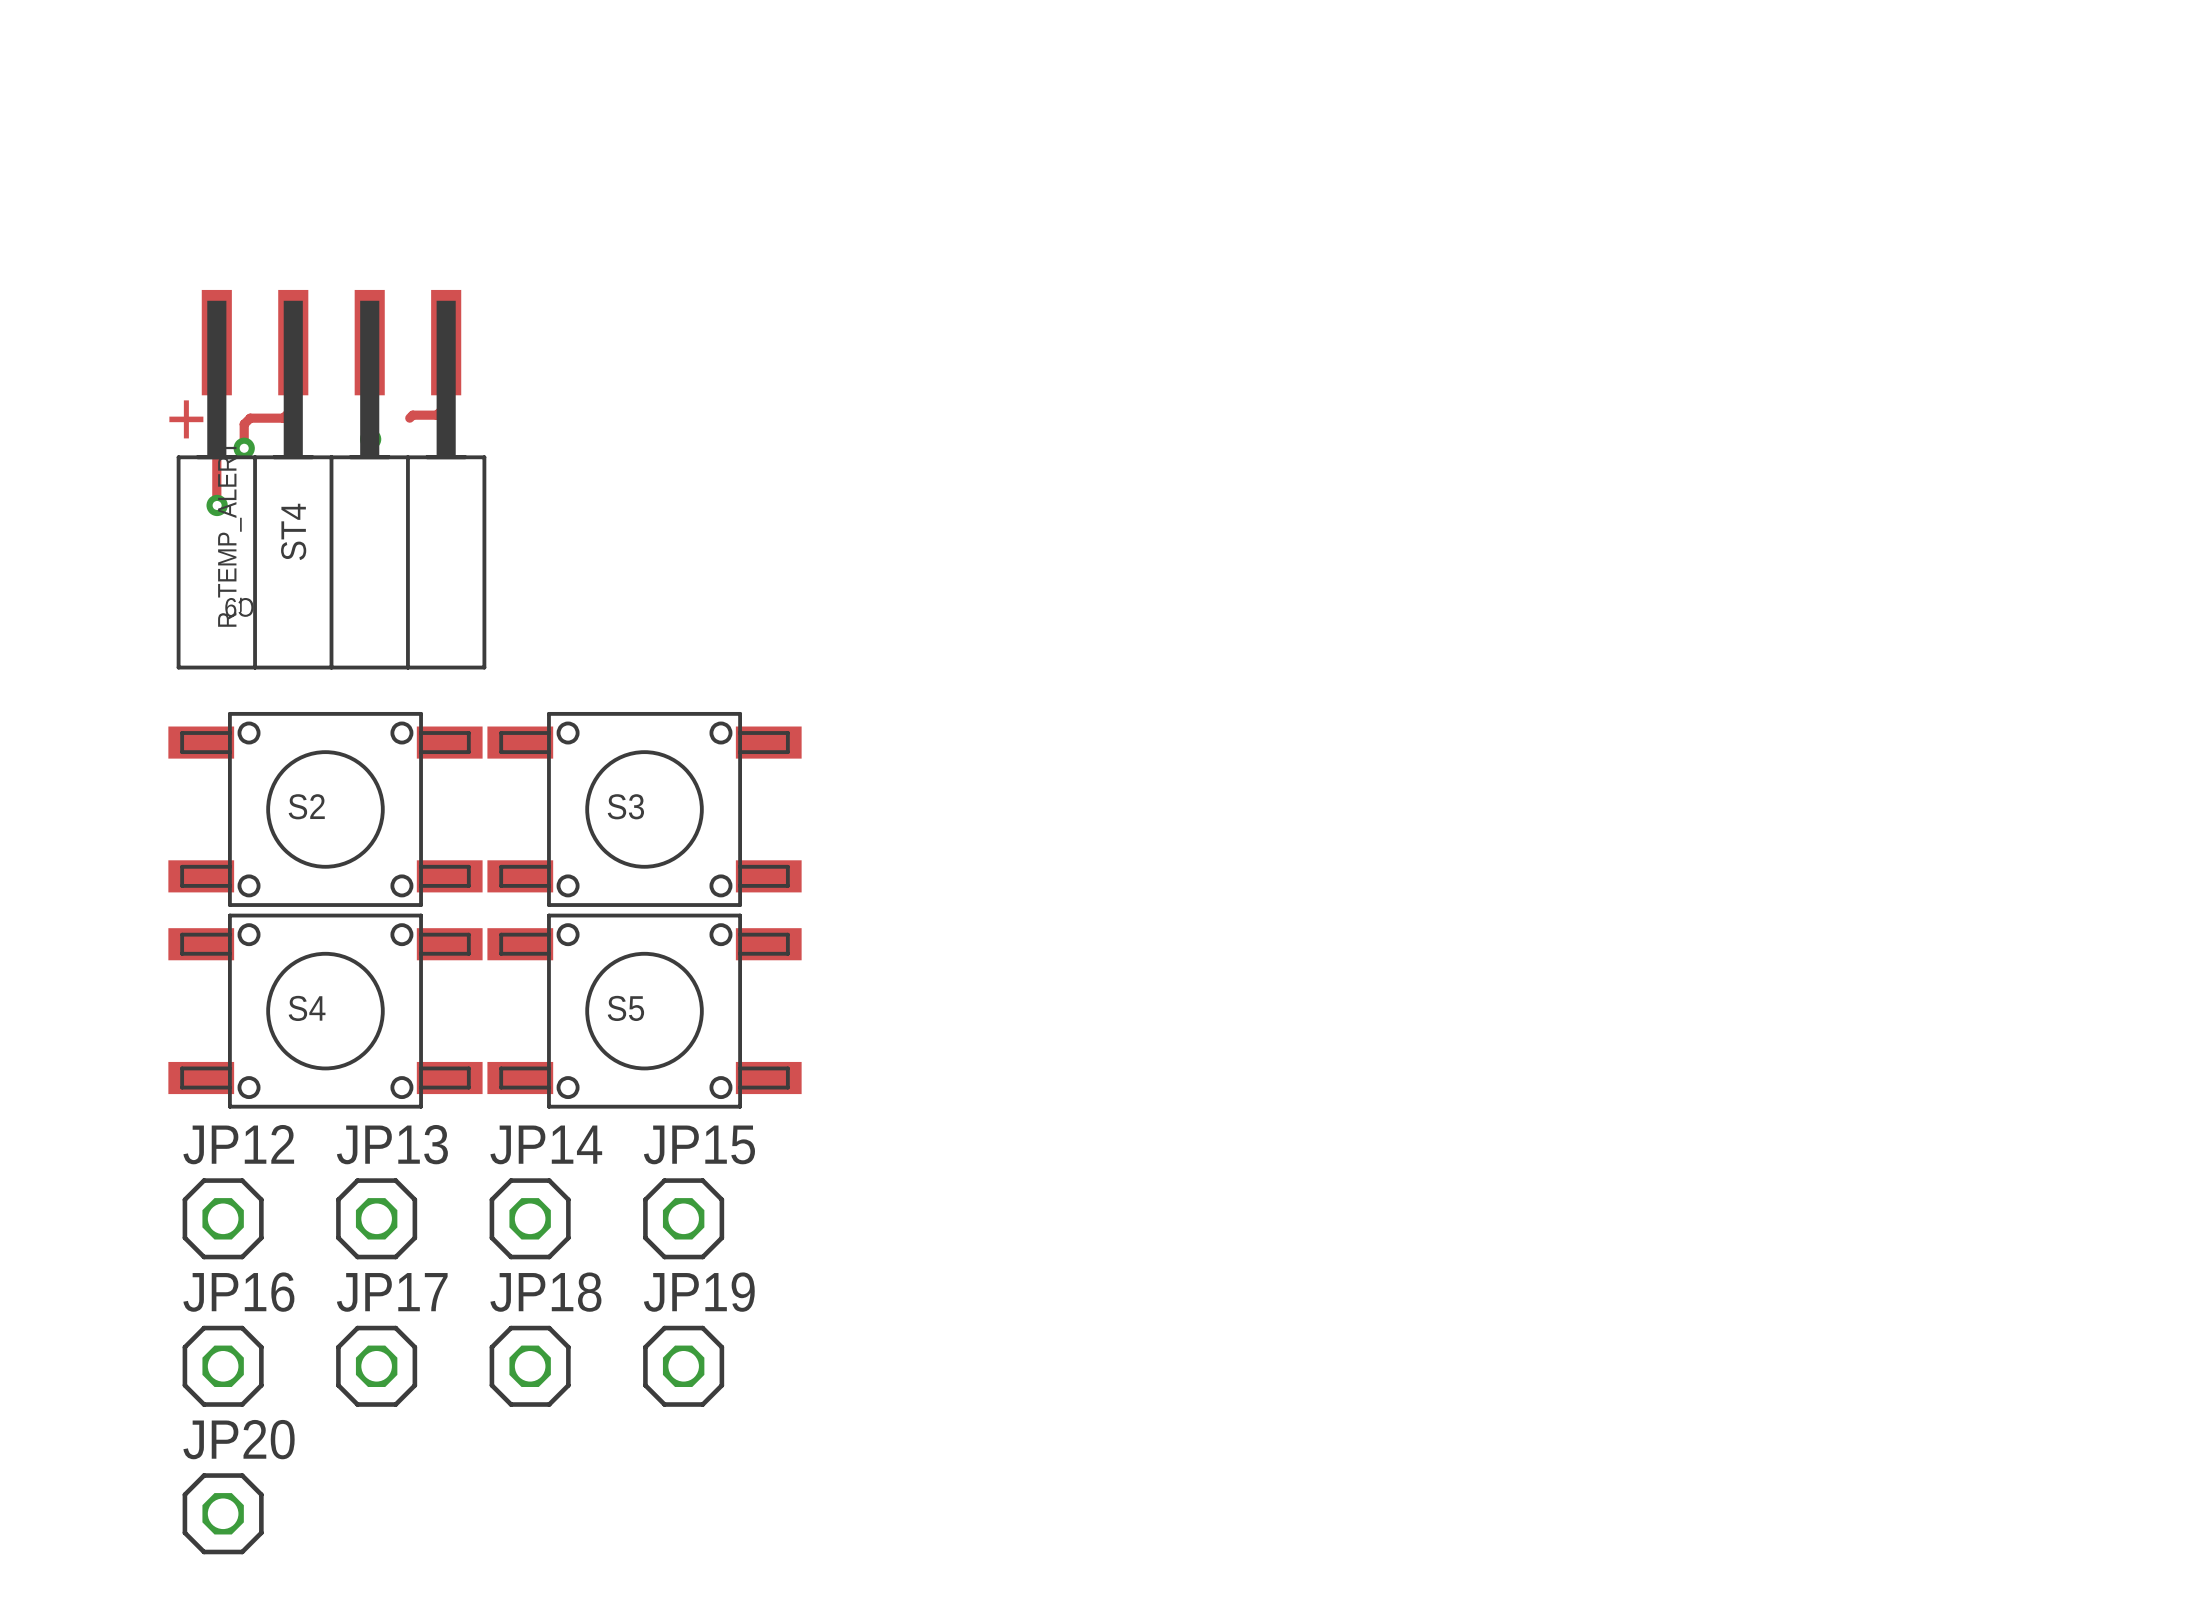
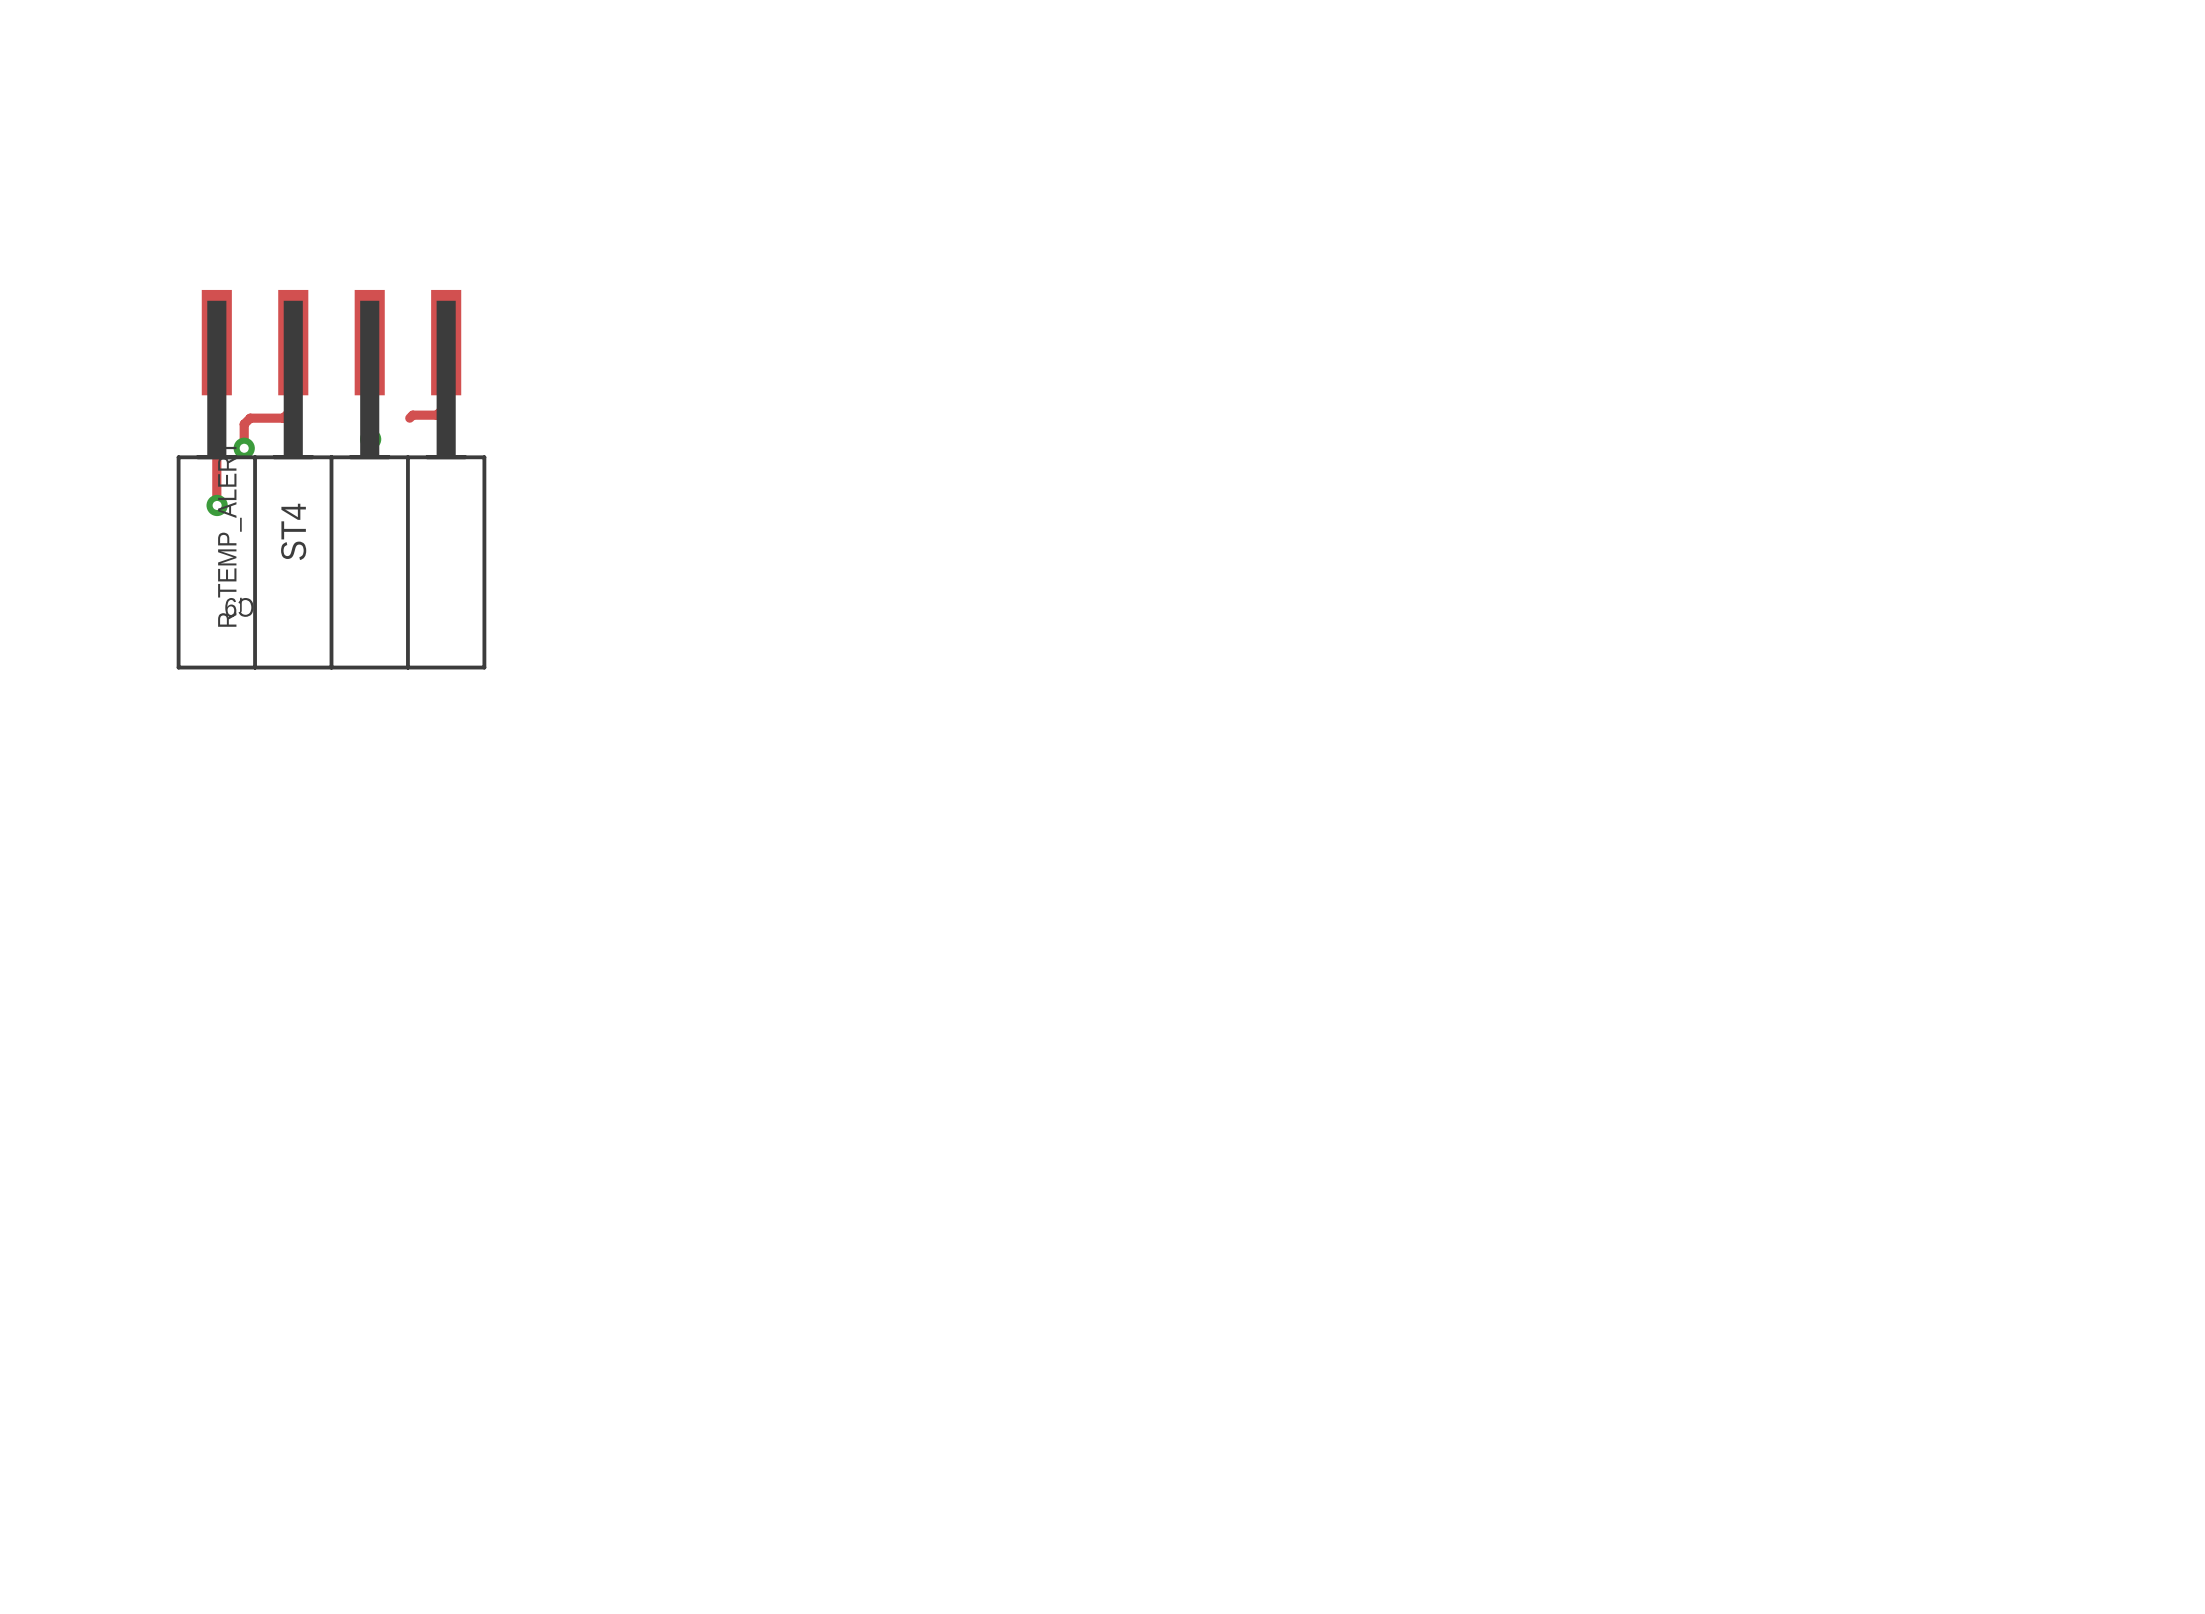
text: + (186, 419) -> none
S2: (325, 809) -> none
S3: (644, 809) -> none
S4: (325, 1011) -> none
S5: (644, 1011) -> none
JP12: (223, 1218) -> none
JP13: (376, 1218) -> none
JP14: (530, 1218) -> none
JP15: (683, 1218) -> none
JP16: (223, 1366) -> none
JP17: (376, 1366) -> none
JP18: (530, 1366) -> none
JP19: (683, 1366) -> none
JP20: (223, 1513) -> none

